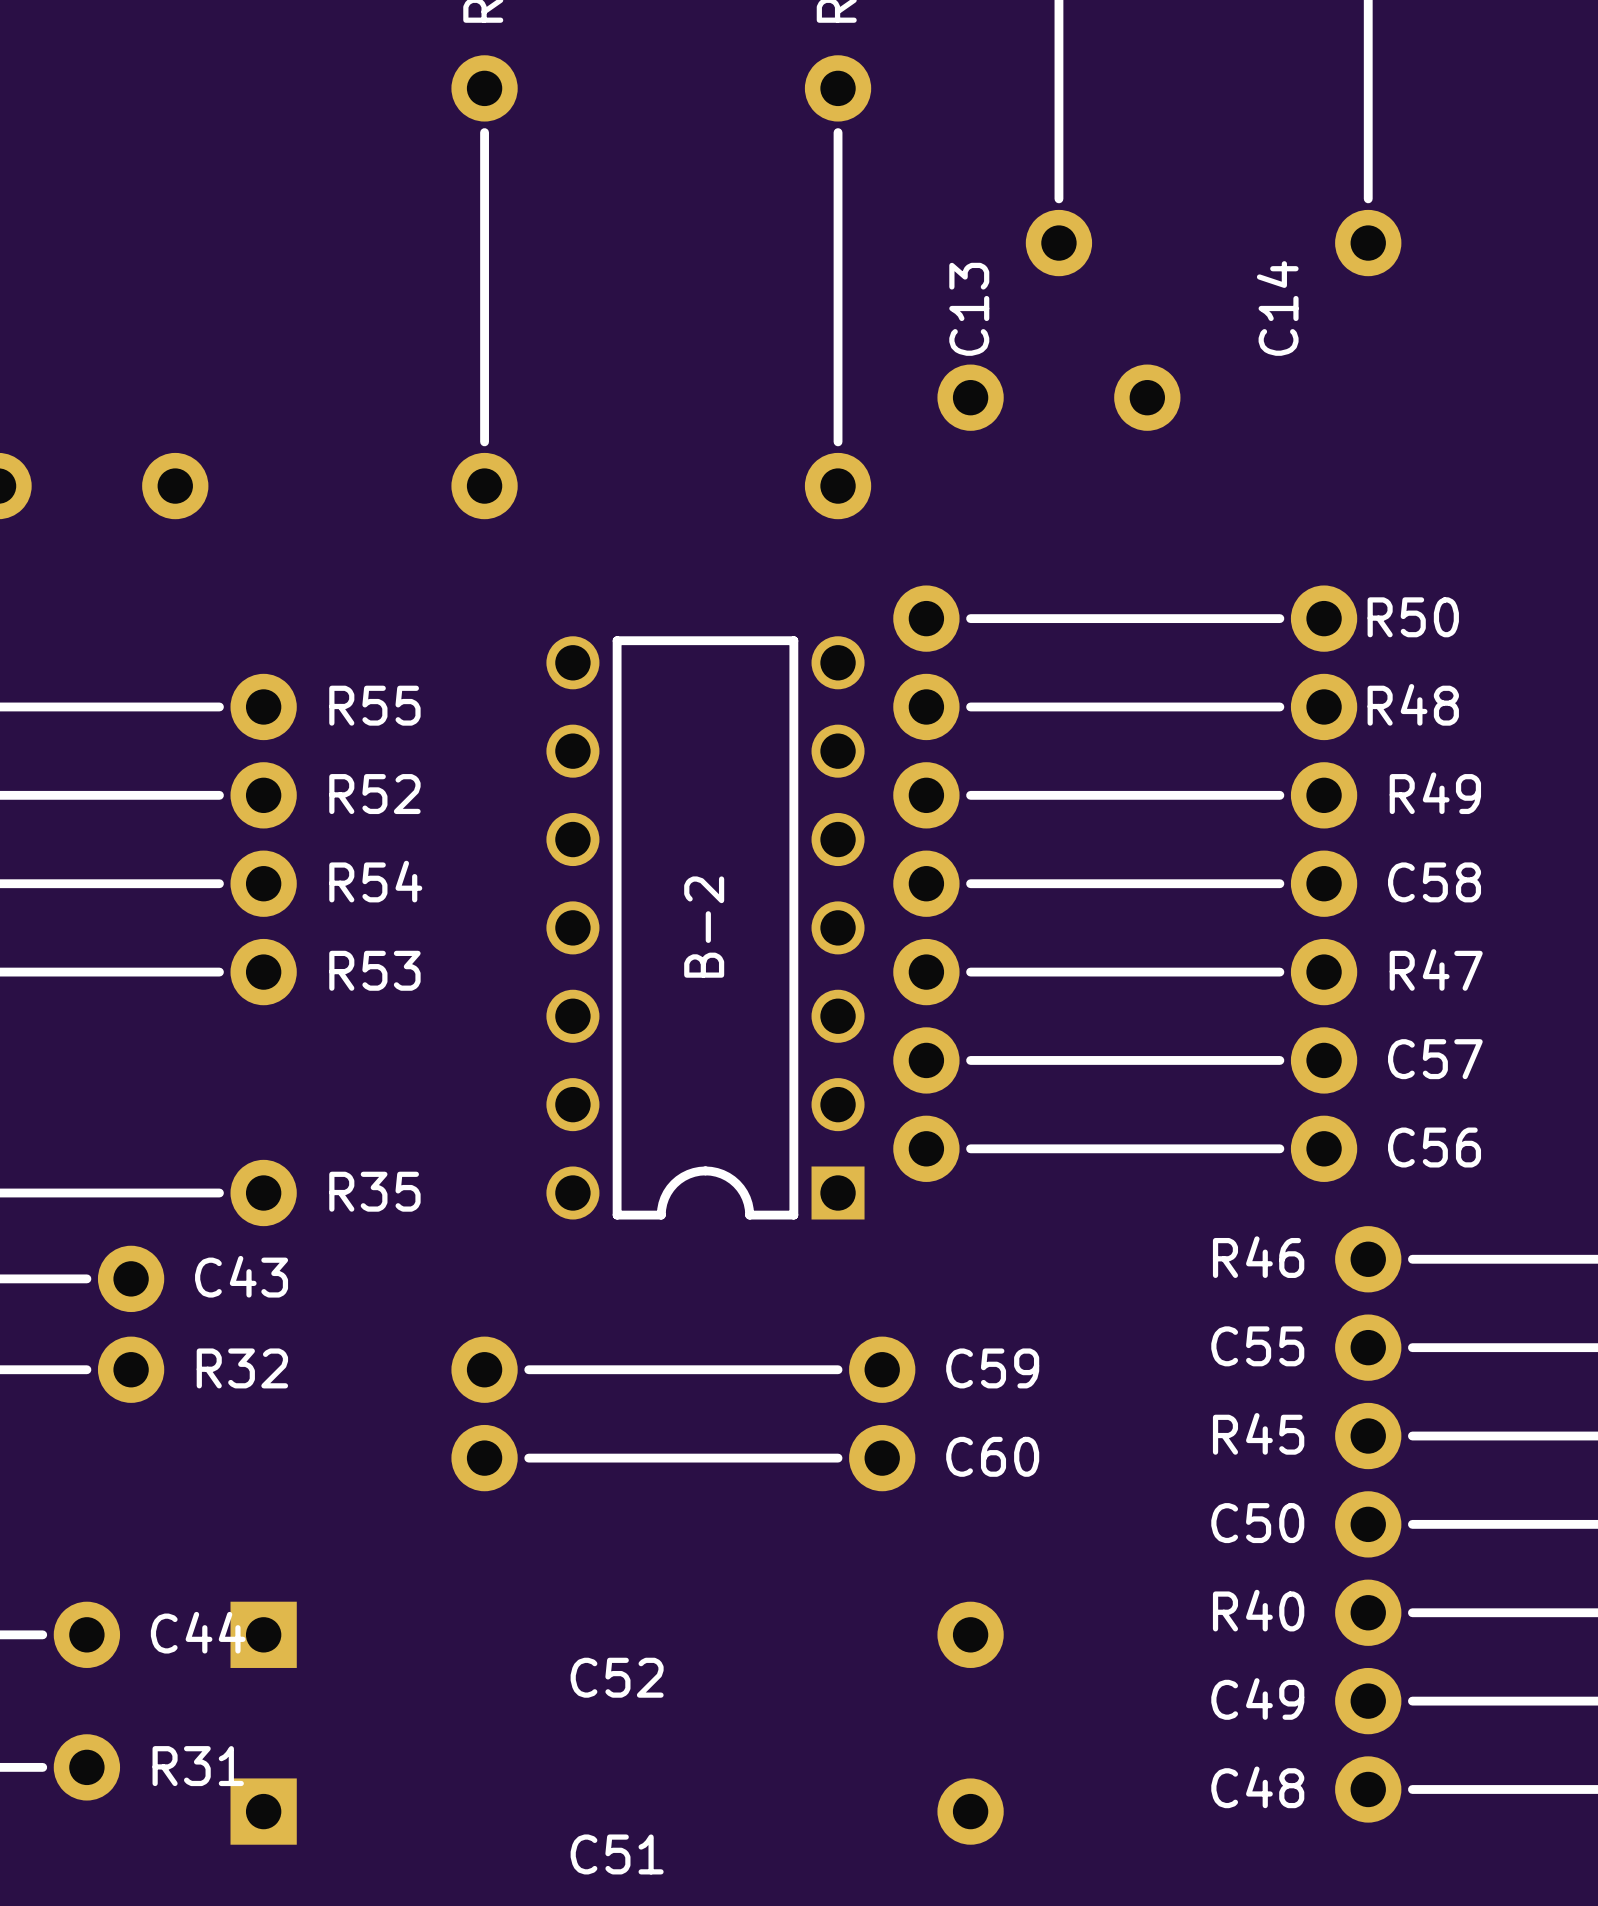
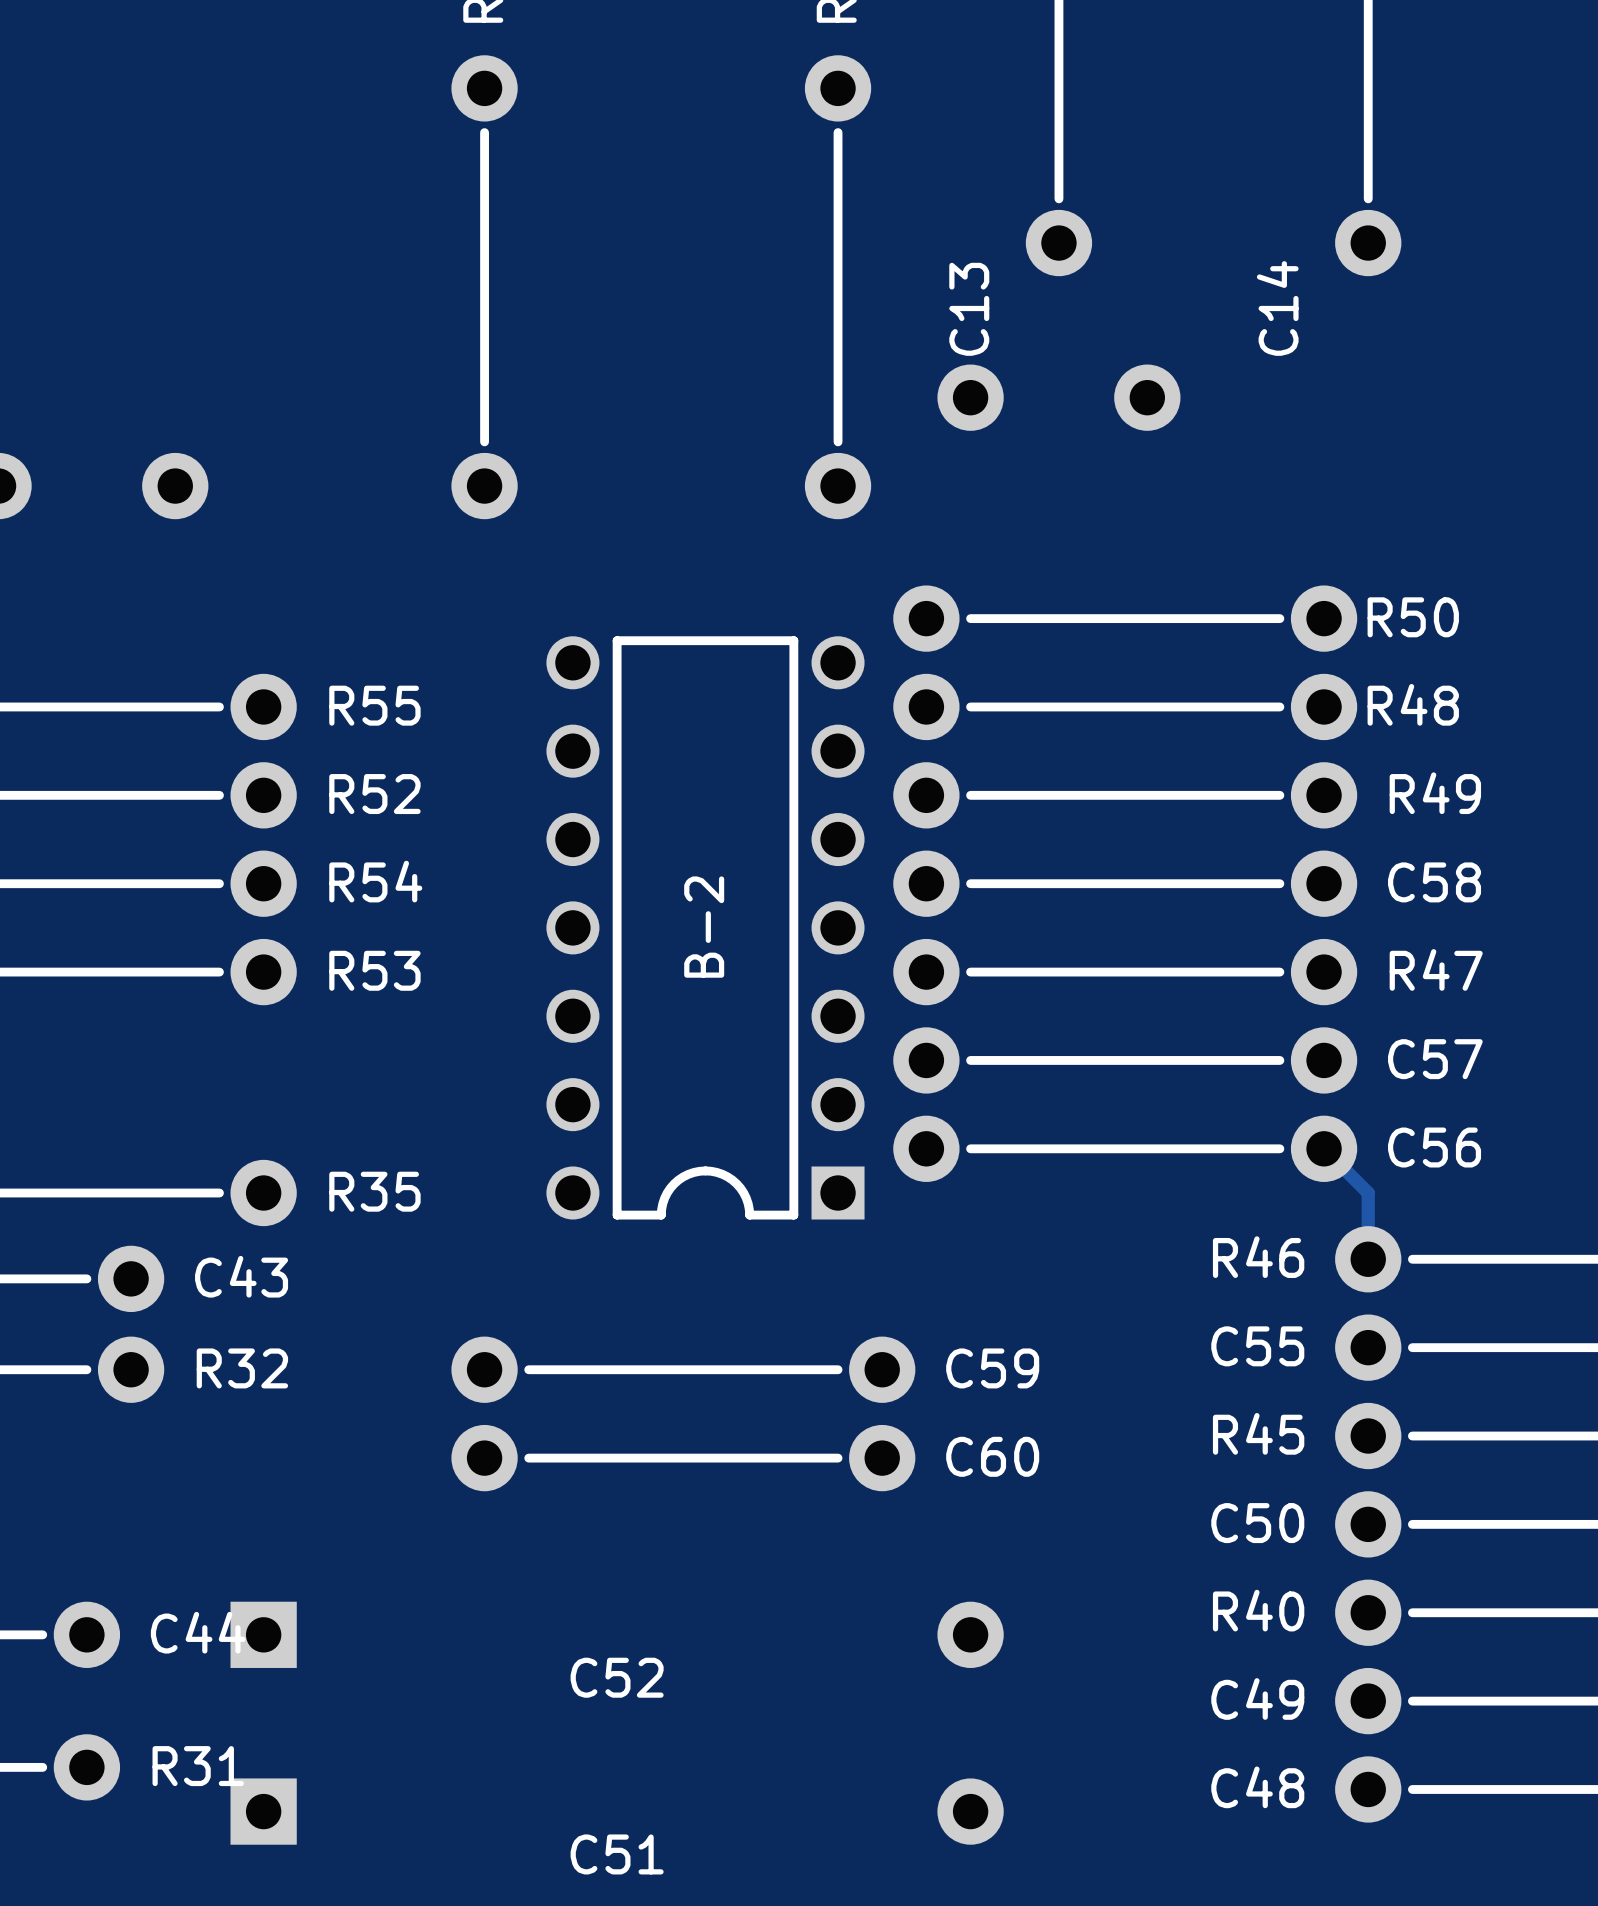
track: none -> (1324, 1148) (1368, 1193) (1368, 1259)

